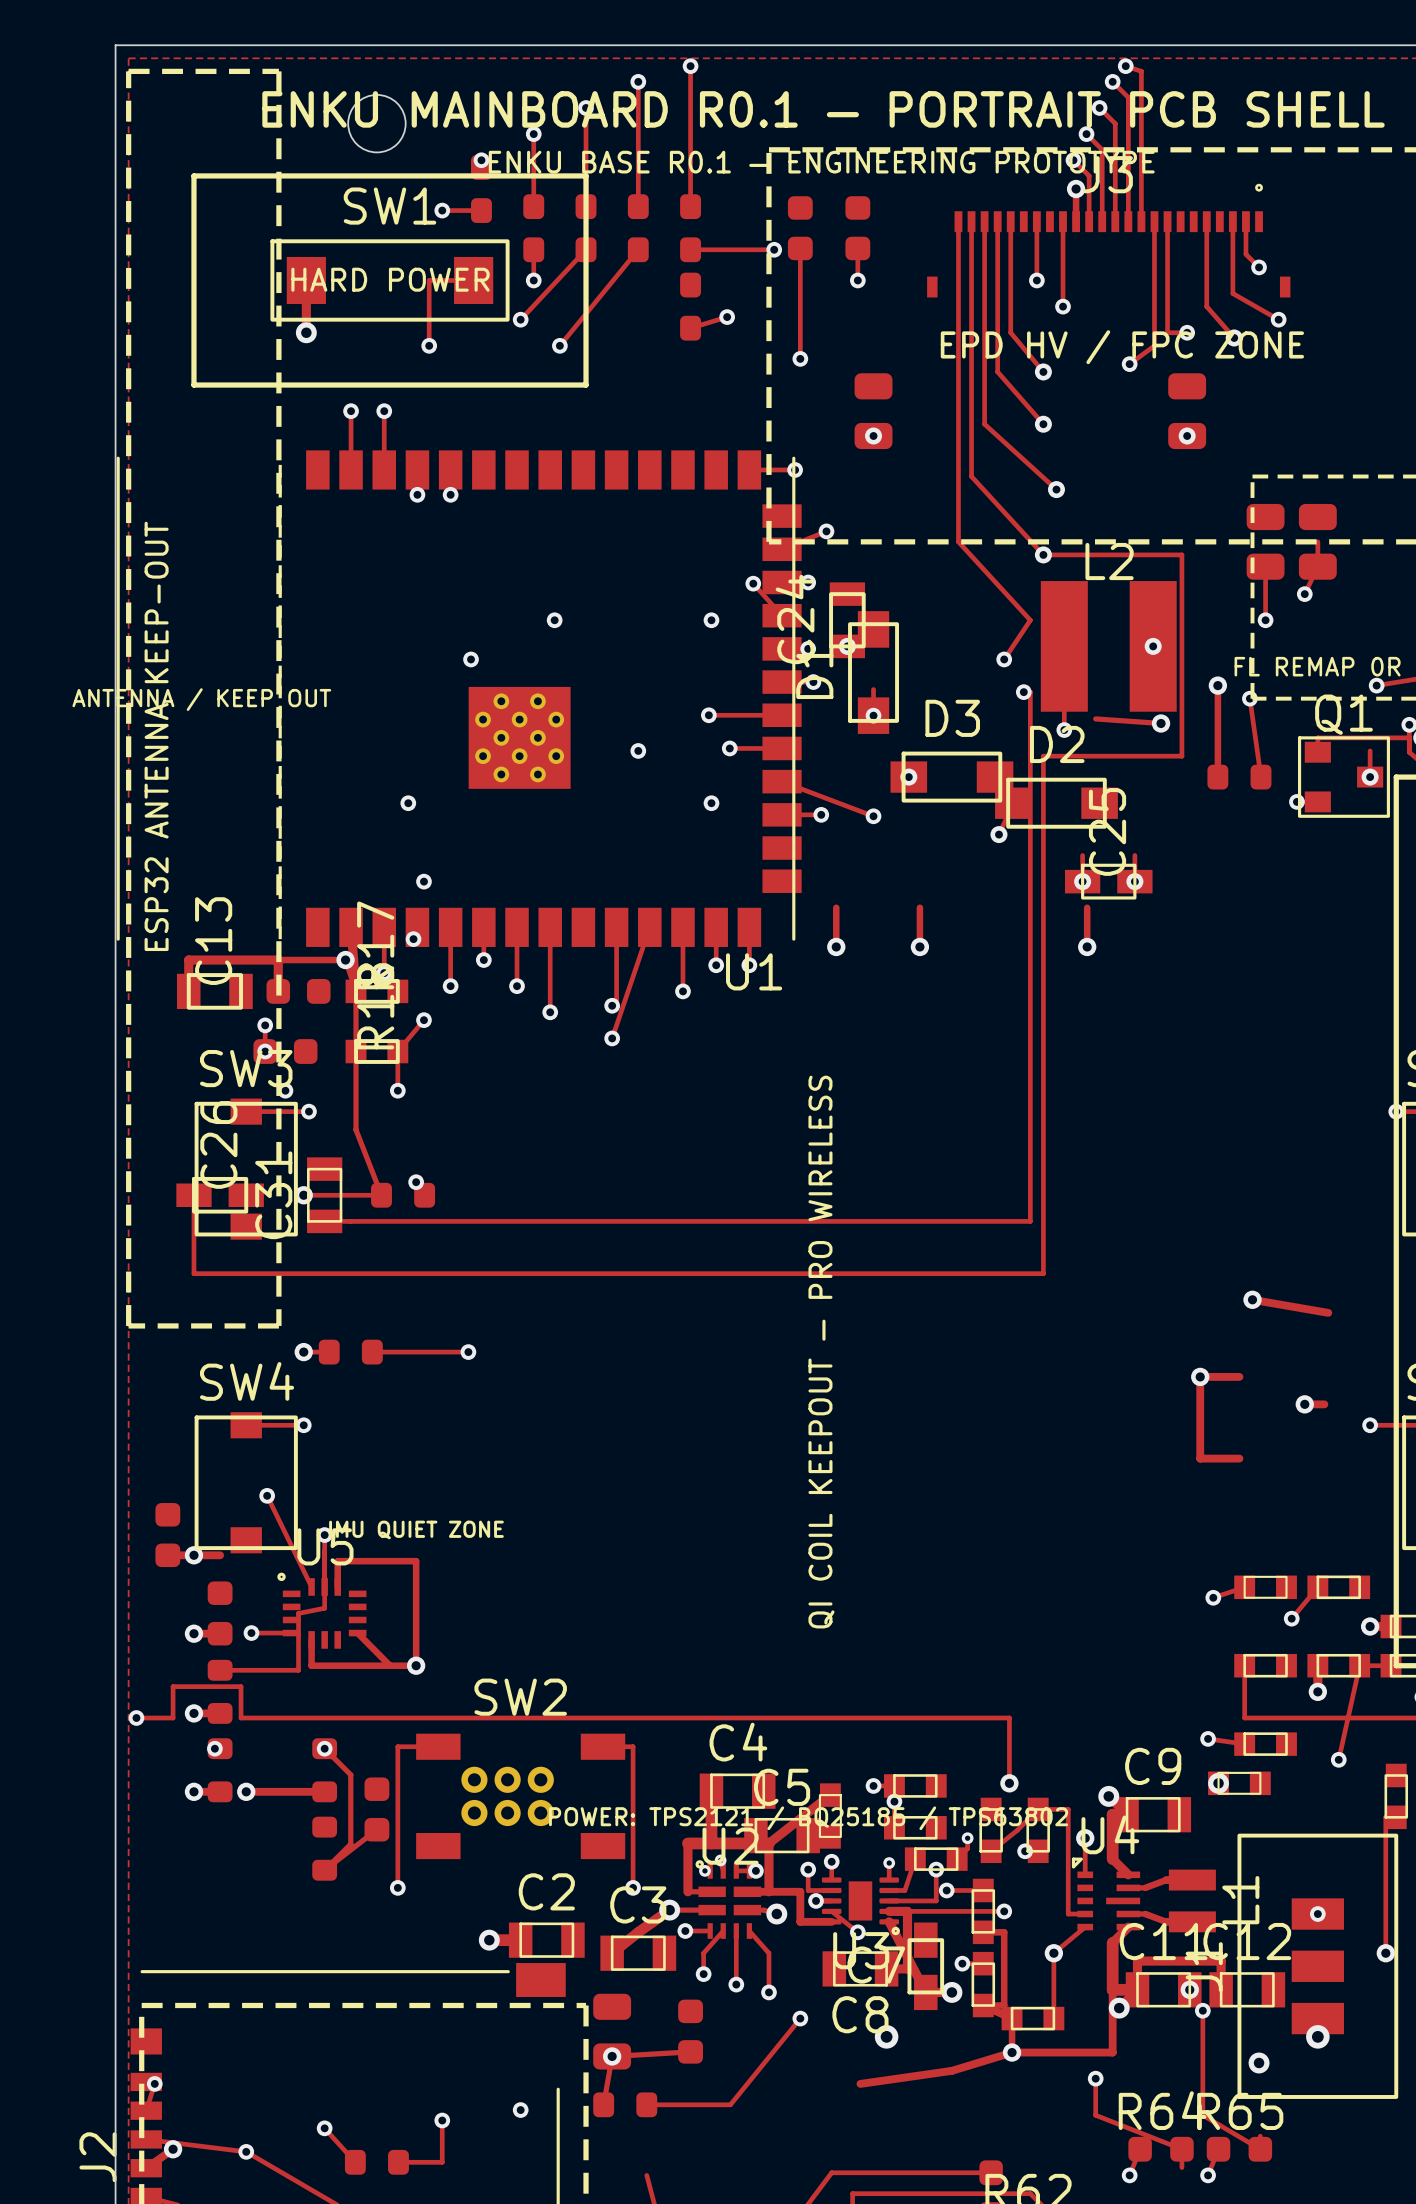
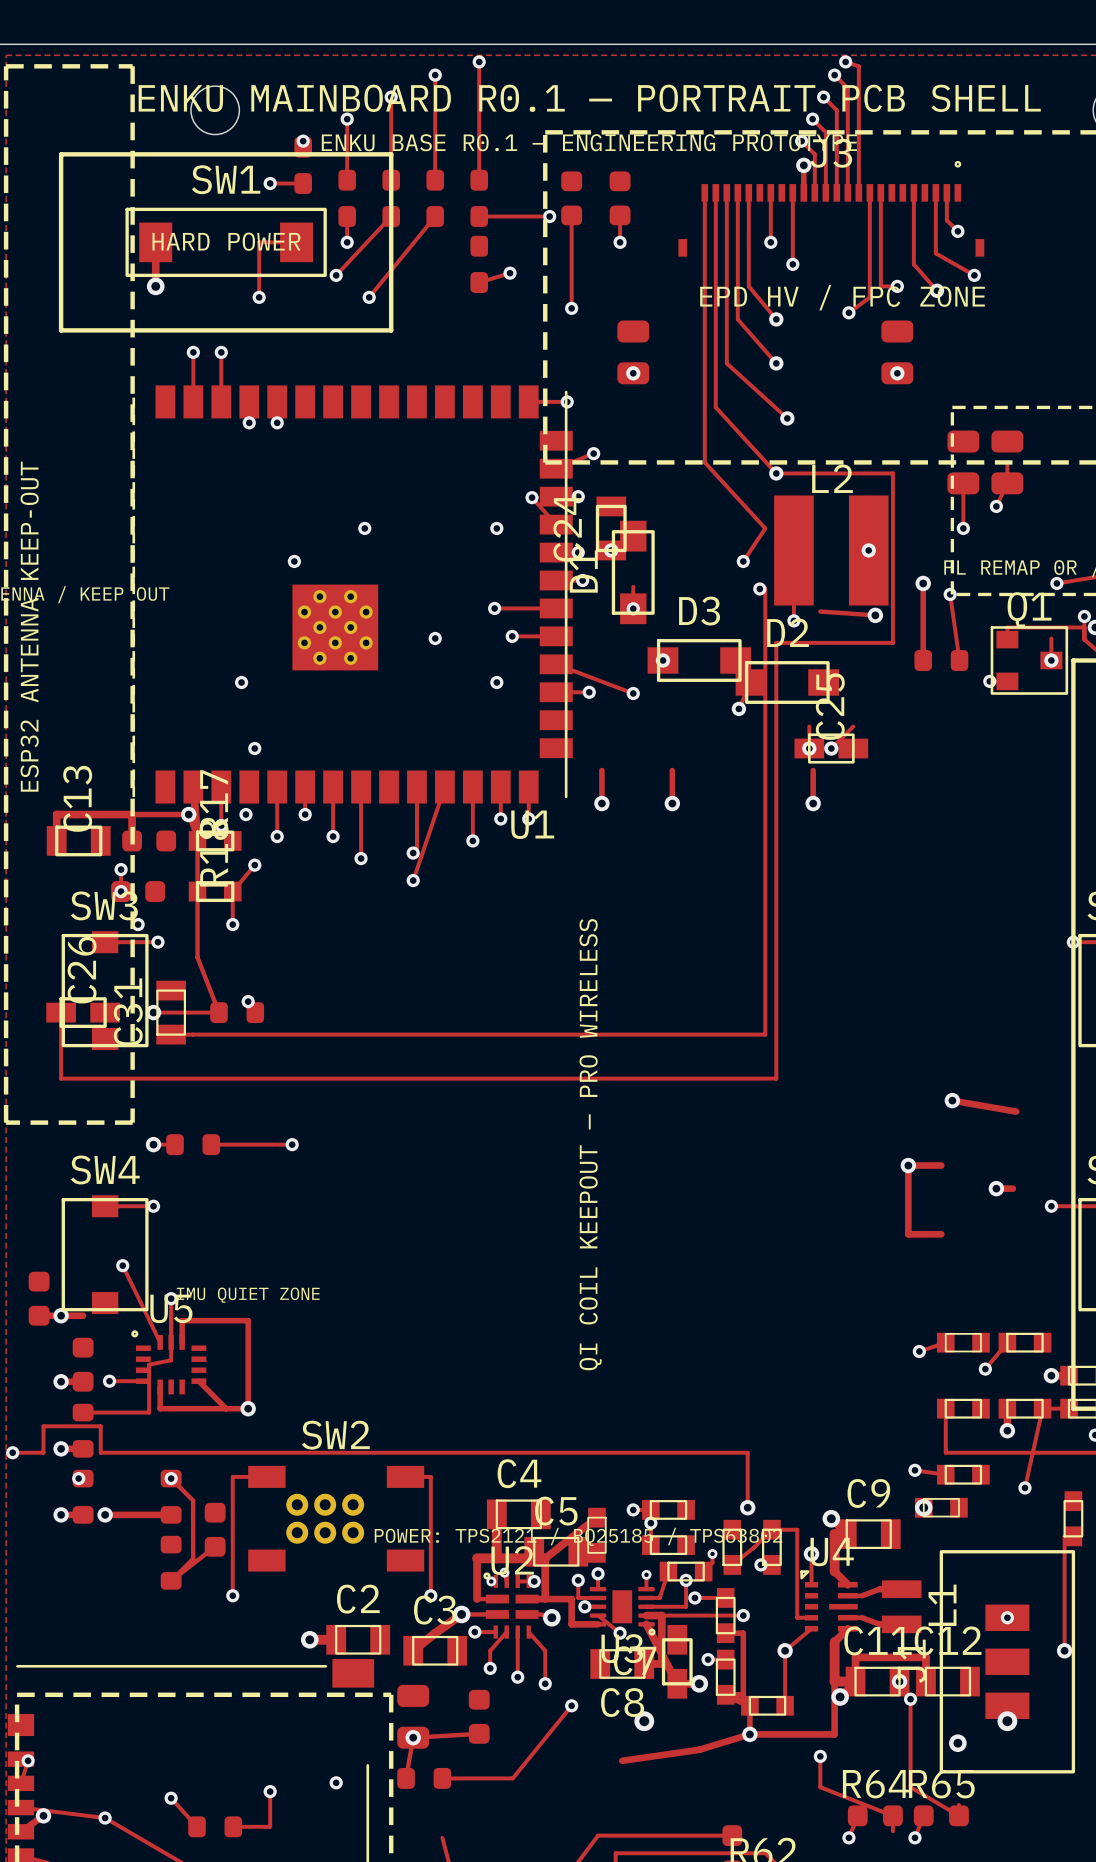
track: (1134, 855) (1134, 881) -> (853, 726) (831, 748)
via position: (1134, 881) -> (831, 748)
via position: (413, 939) -> (245, 814)

